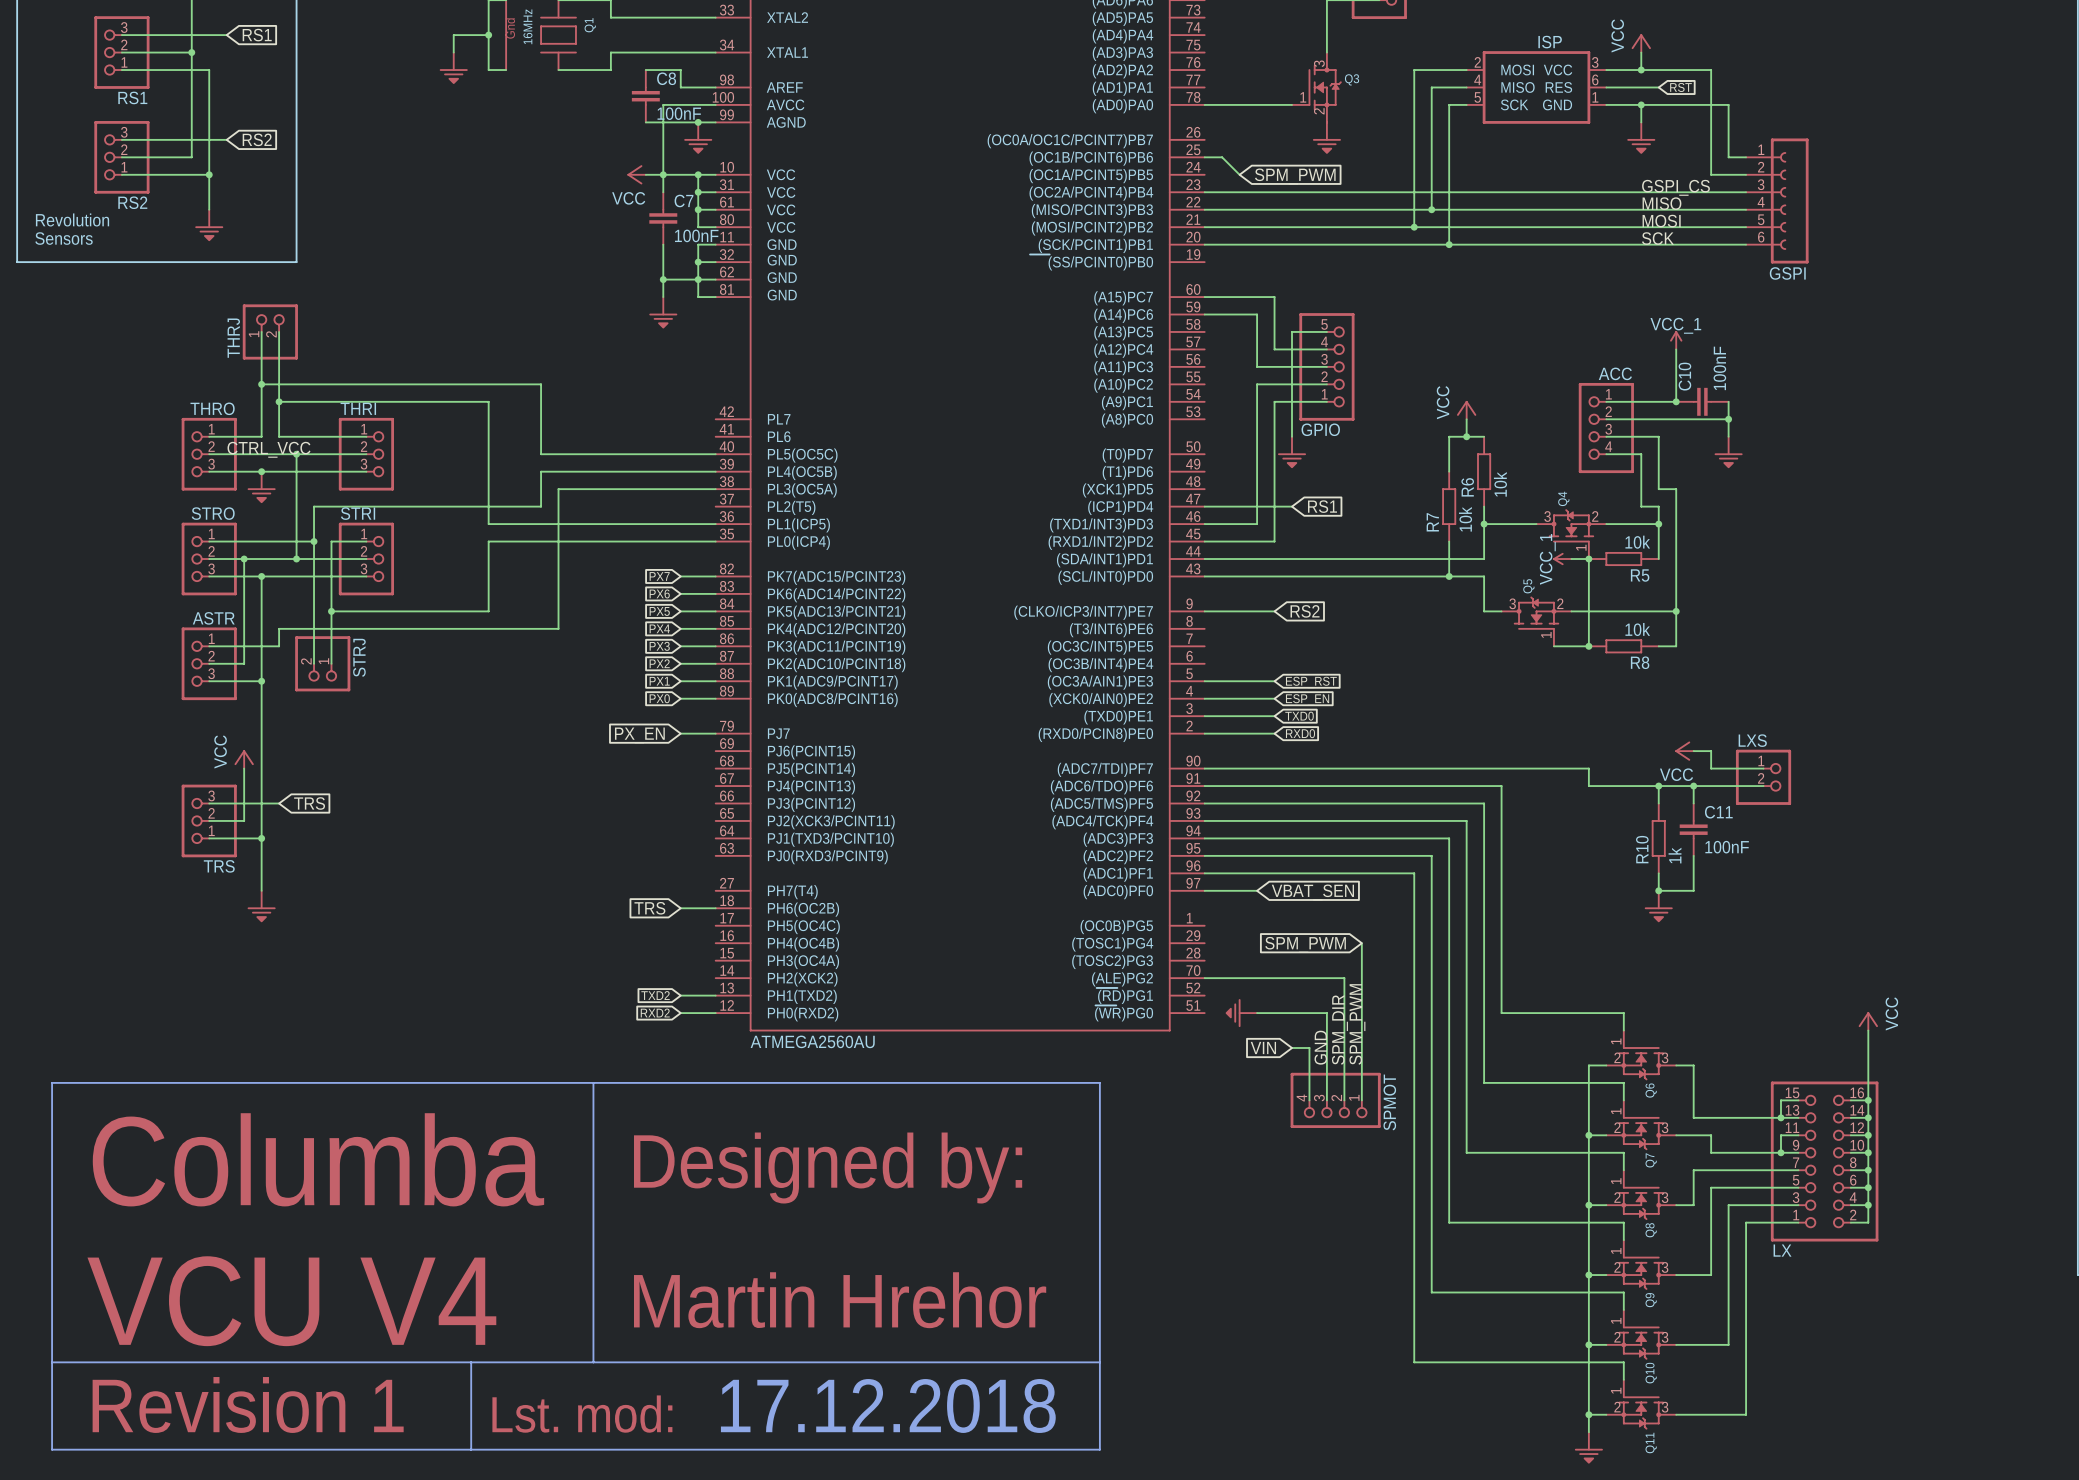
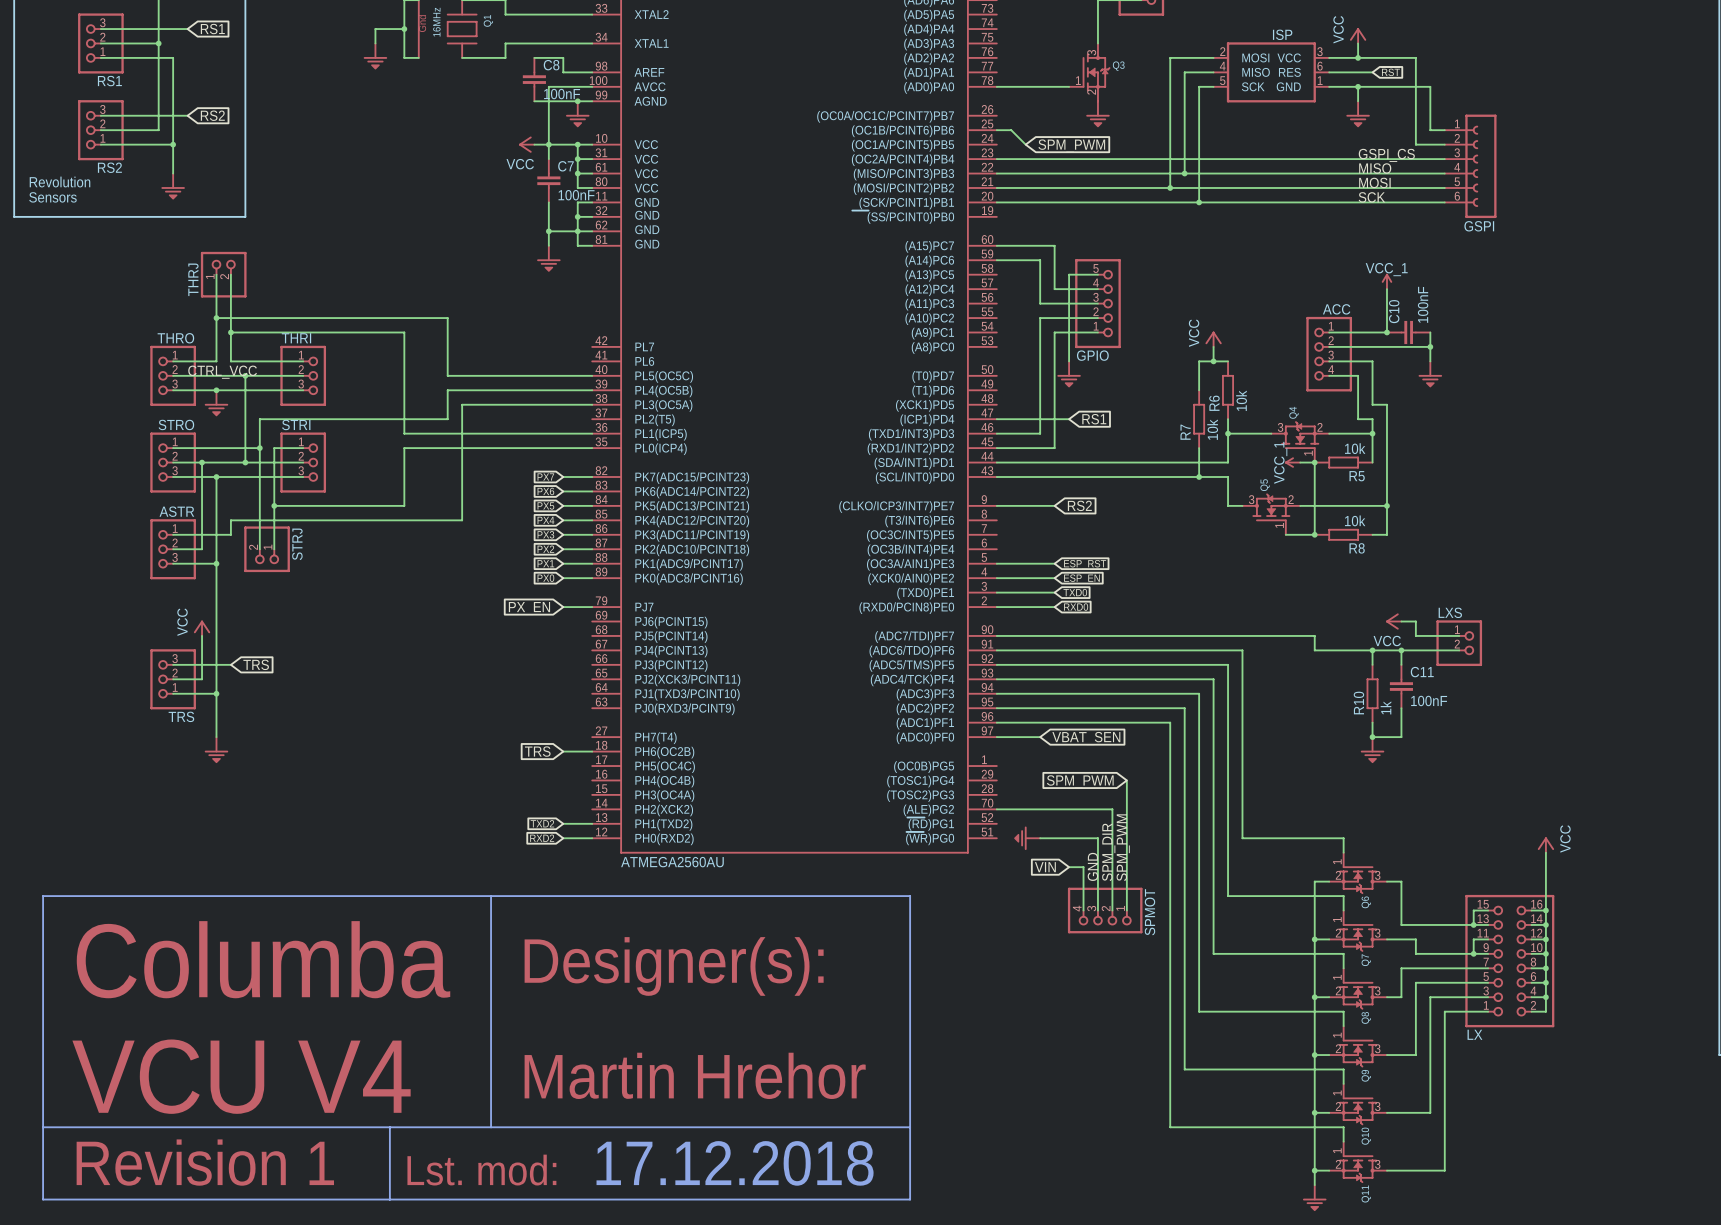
text: Designed by: (828, 1168) -> Designer(s): (674, 966)

